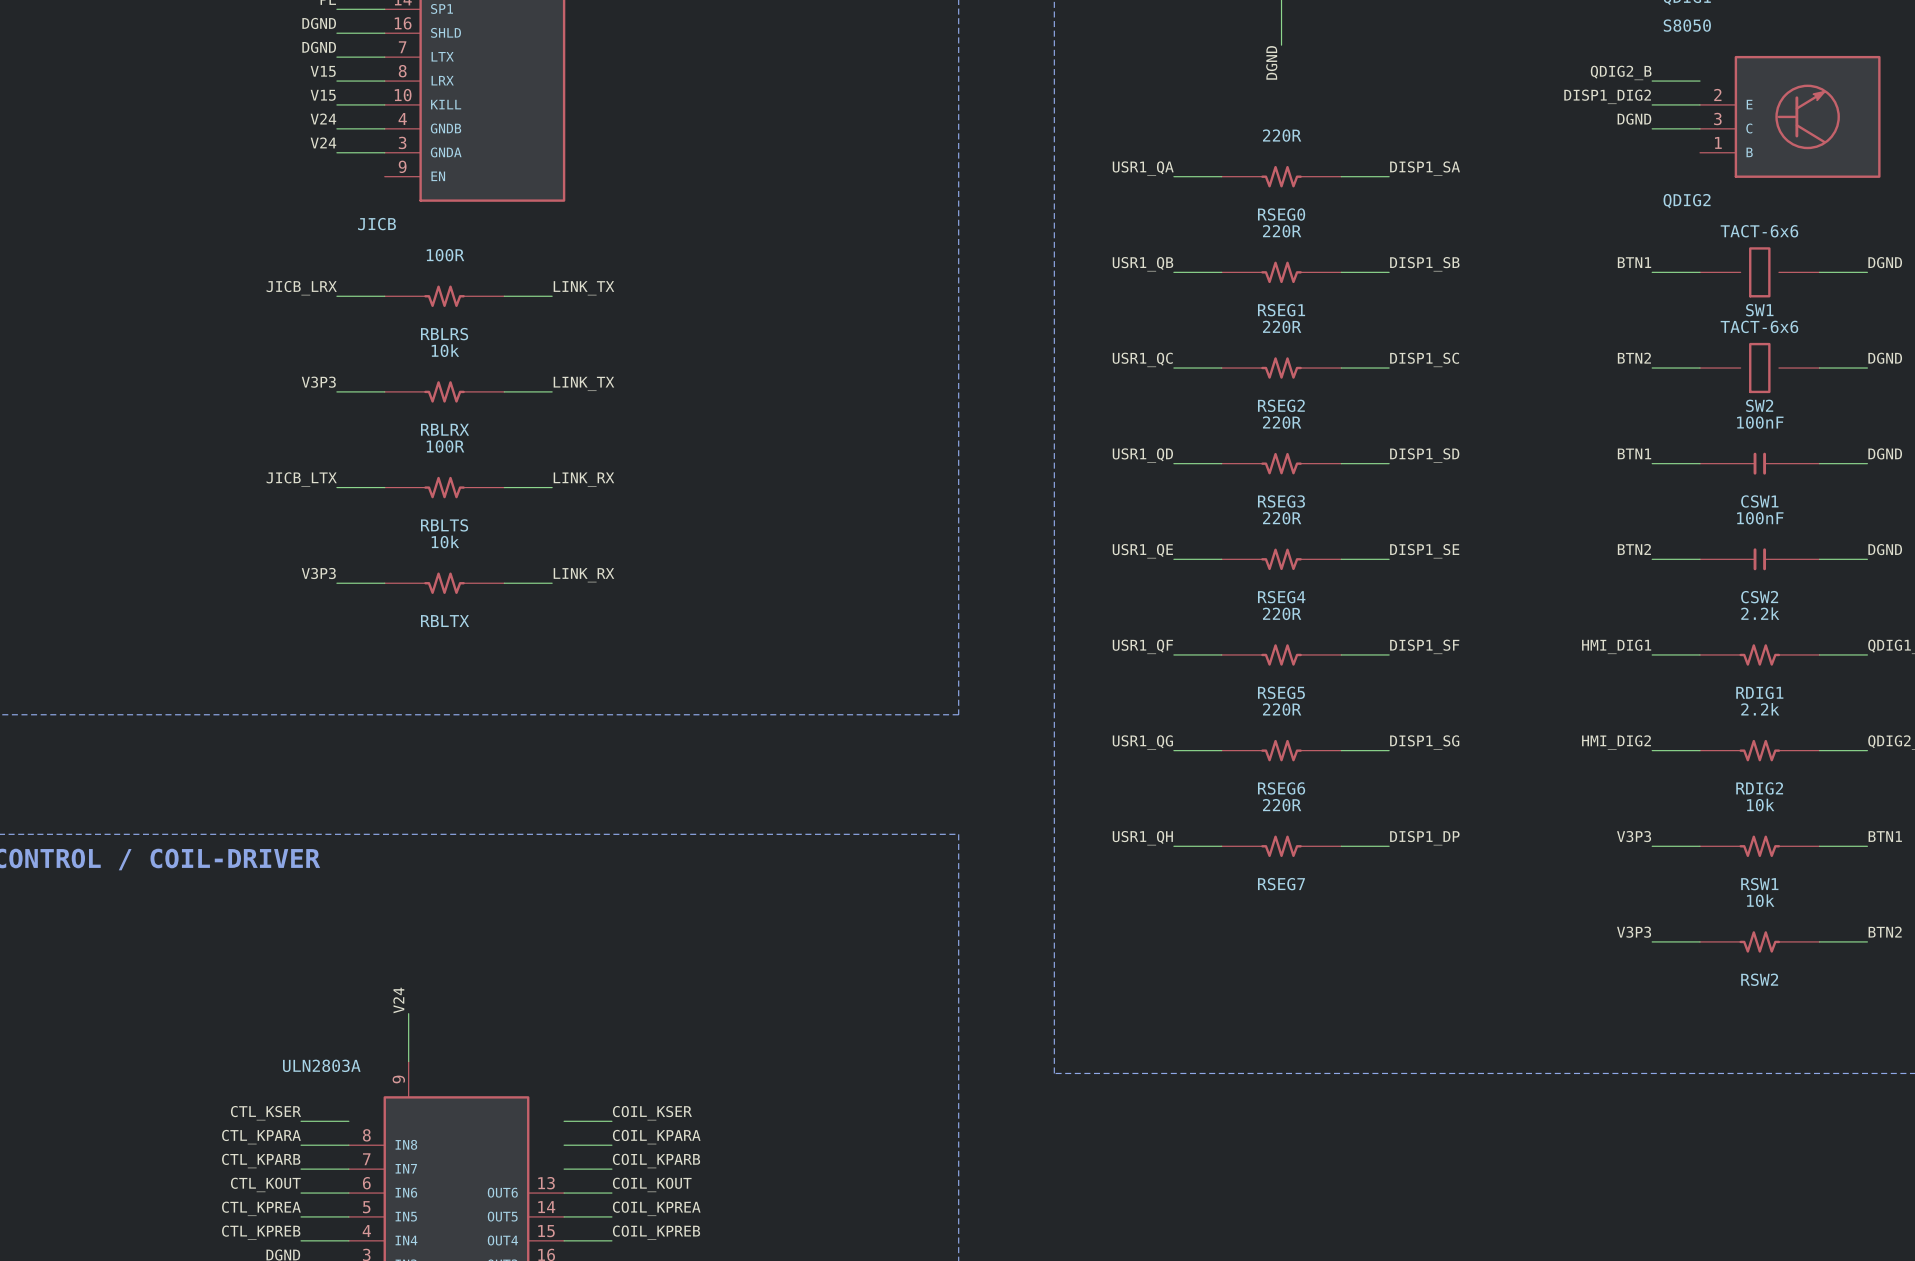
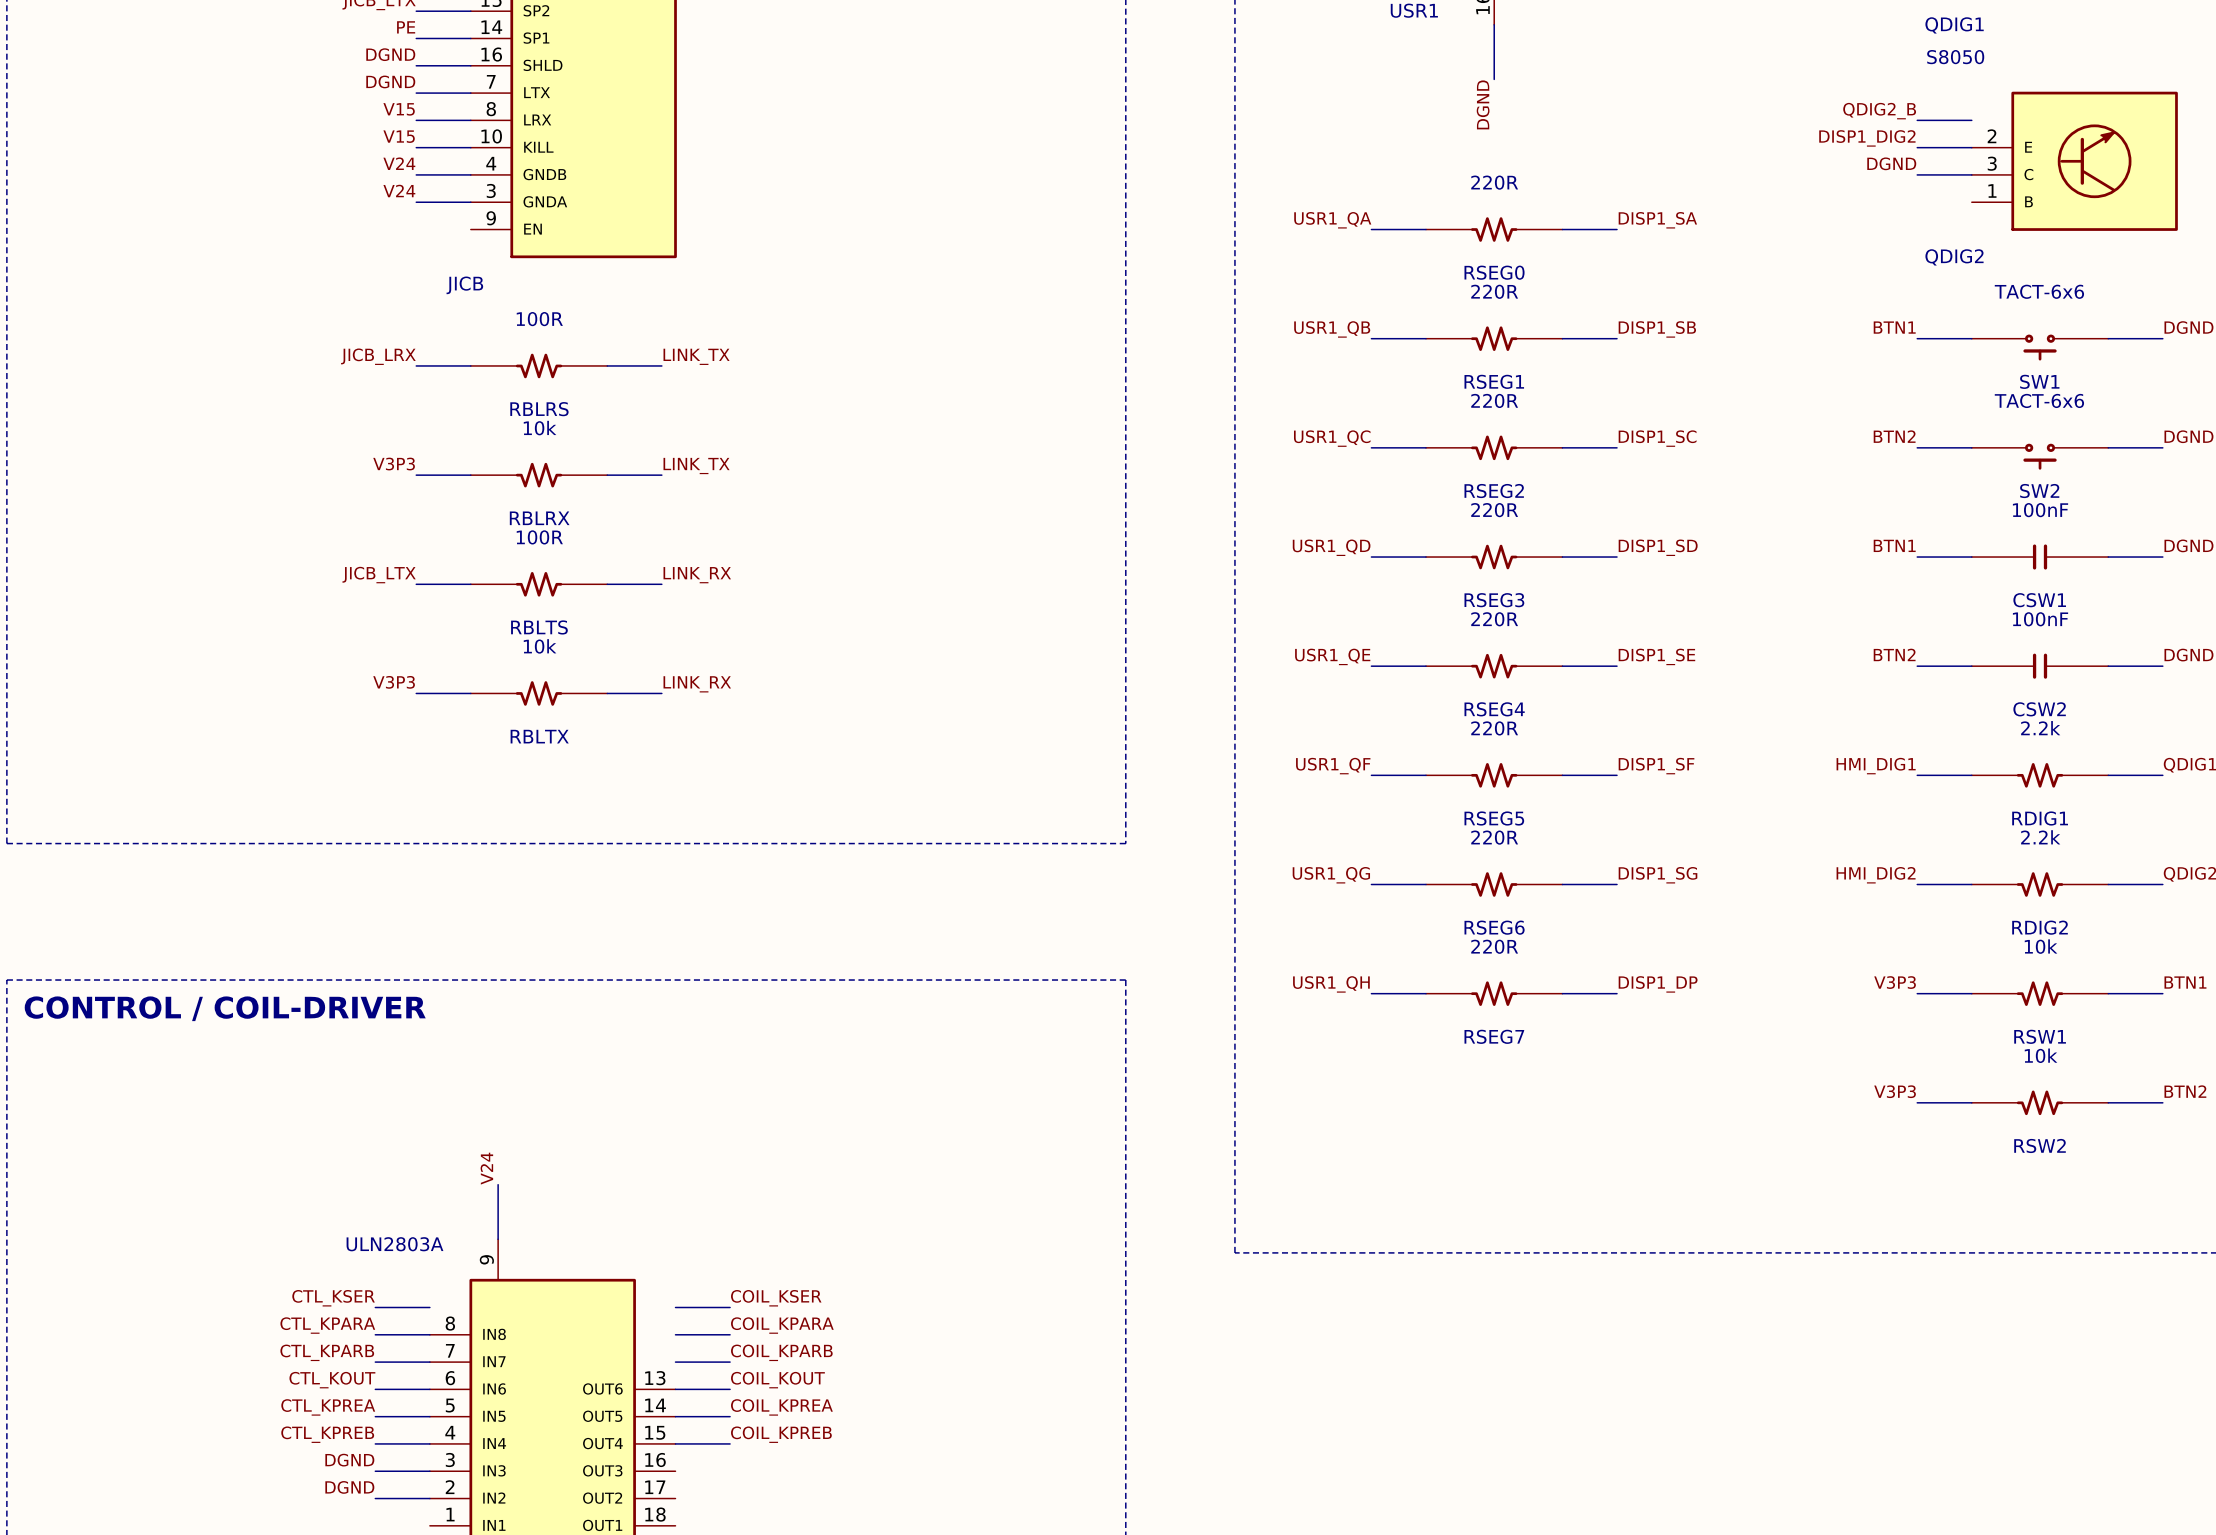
SW1 symbol: [1700, 247, 1820, 298] -> [1971, 334, 2109, 361]
SW2 symbol: [1700, 342, 1820, 394] -> [1971, 443, 2109, 470]

